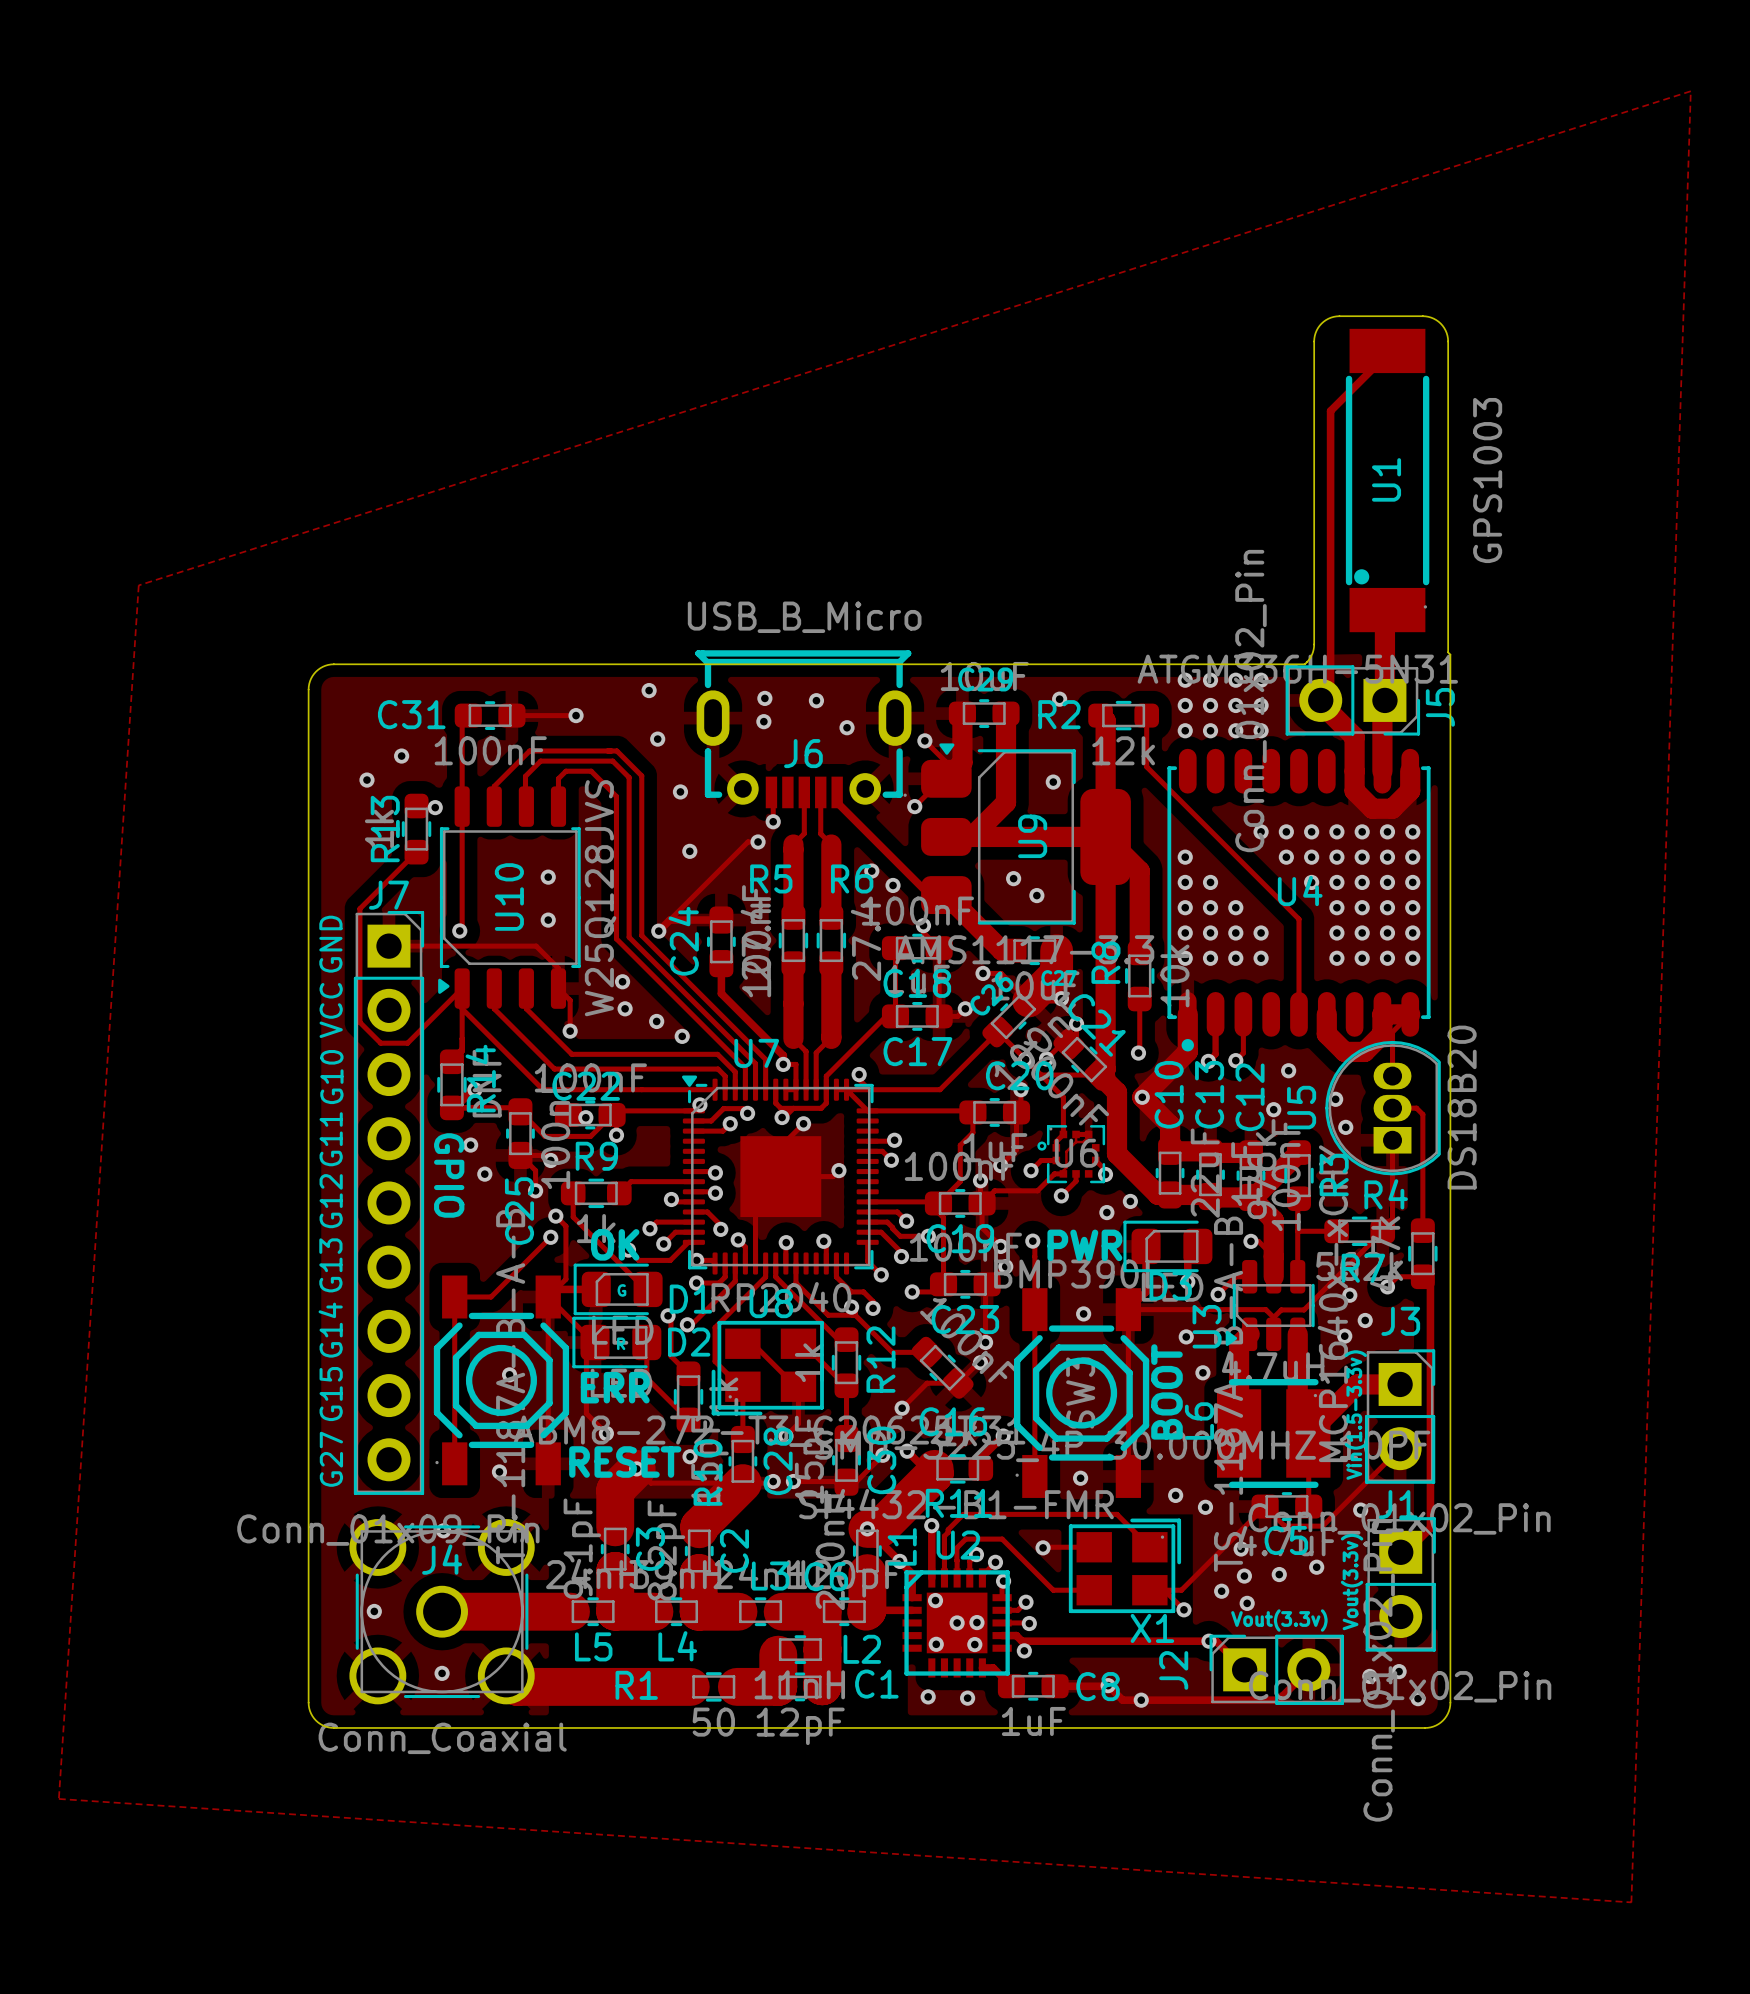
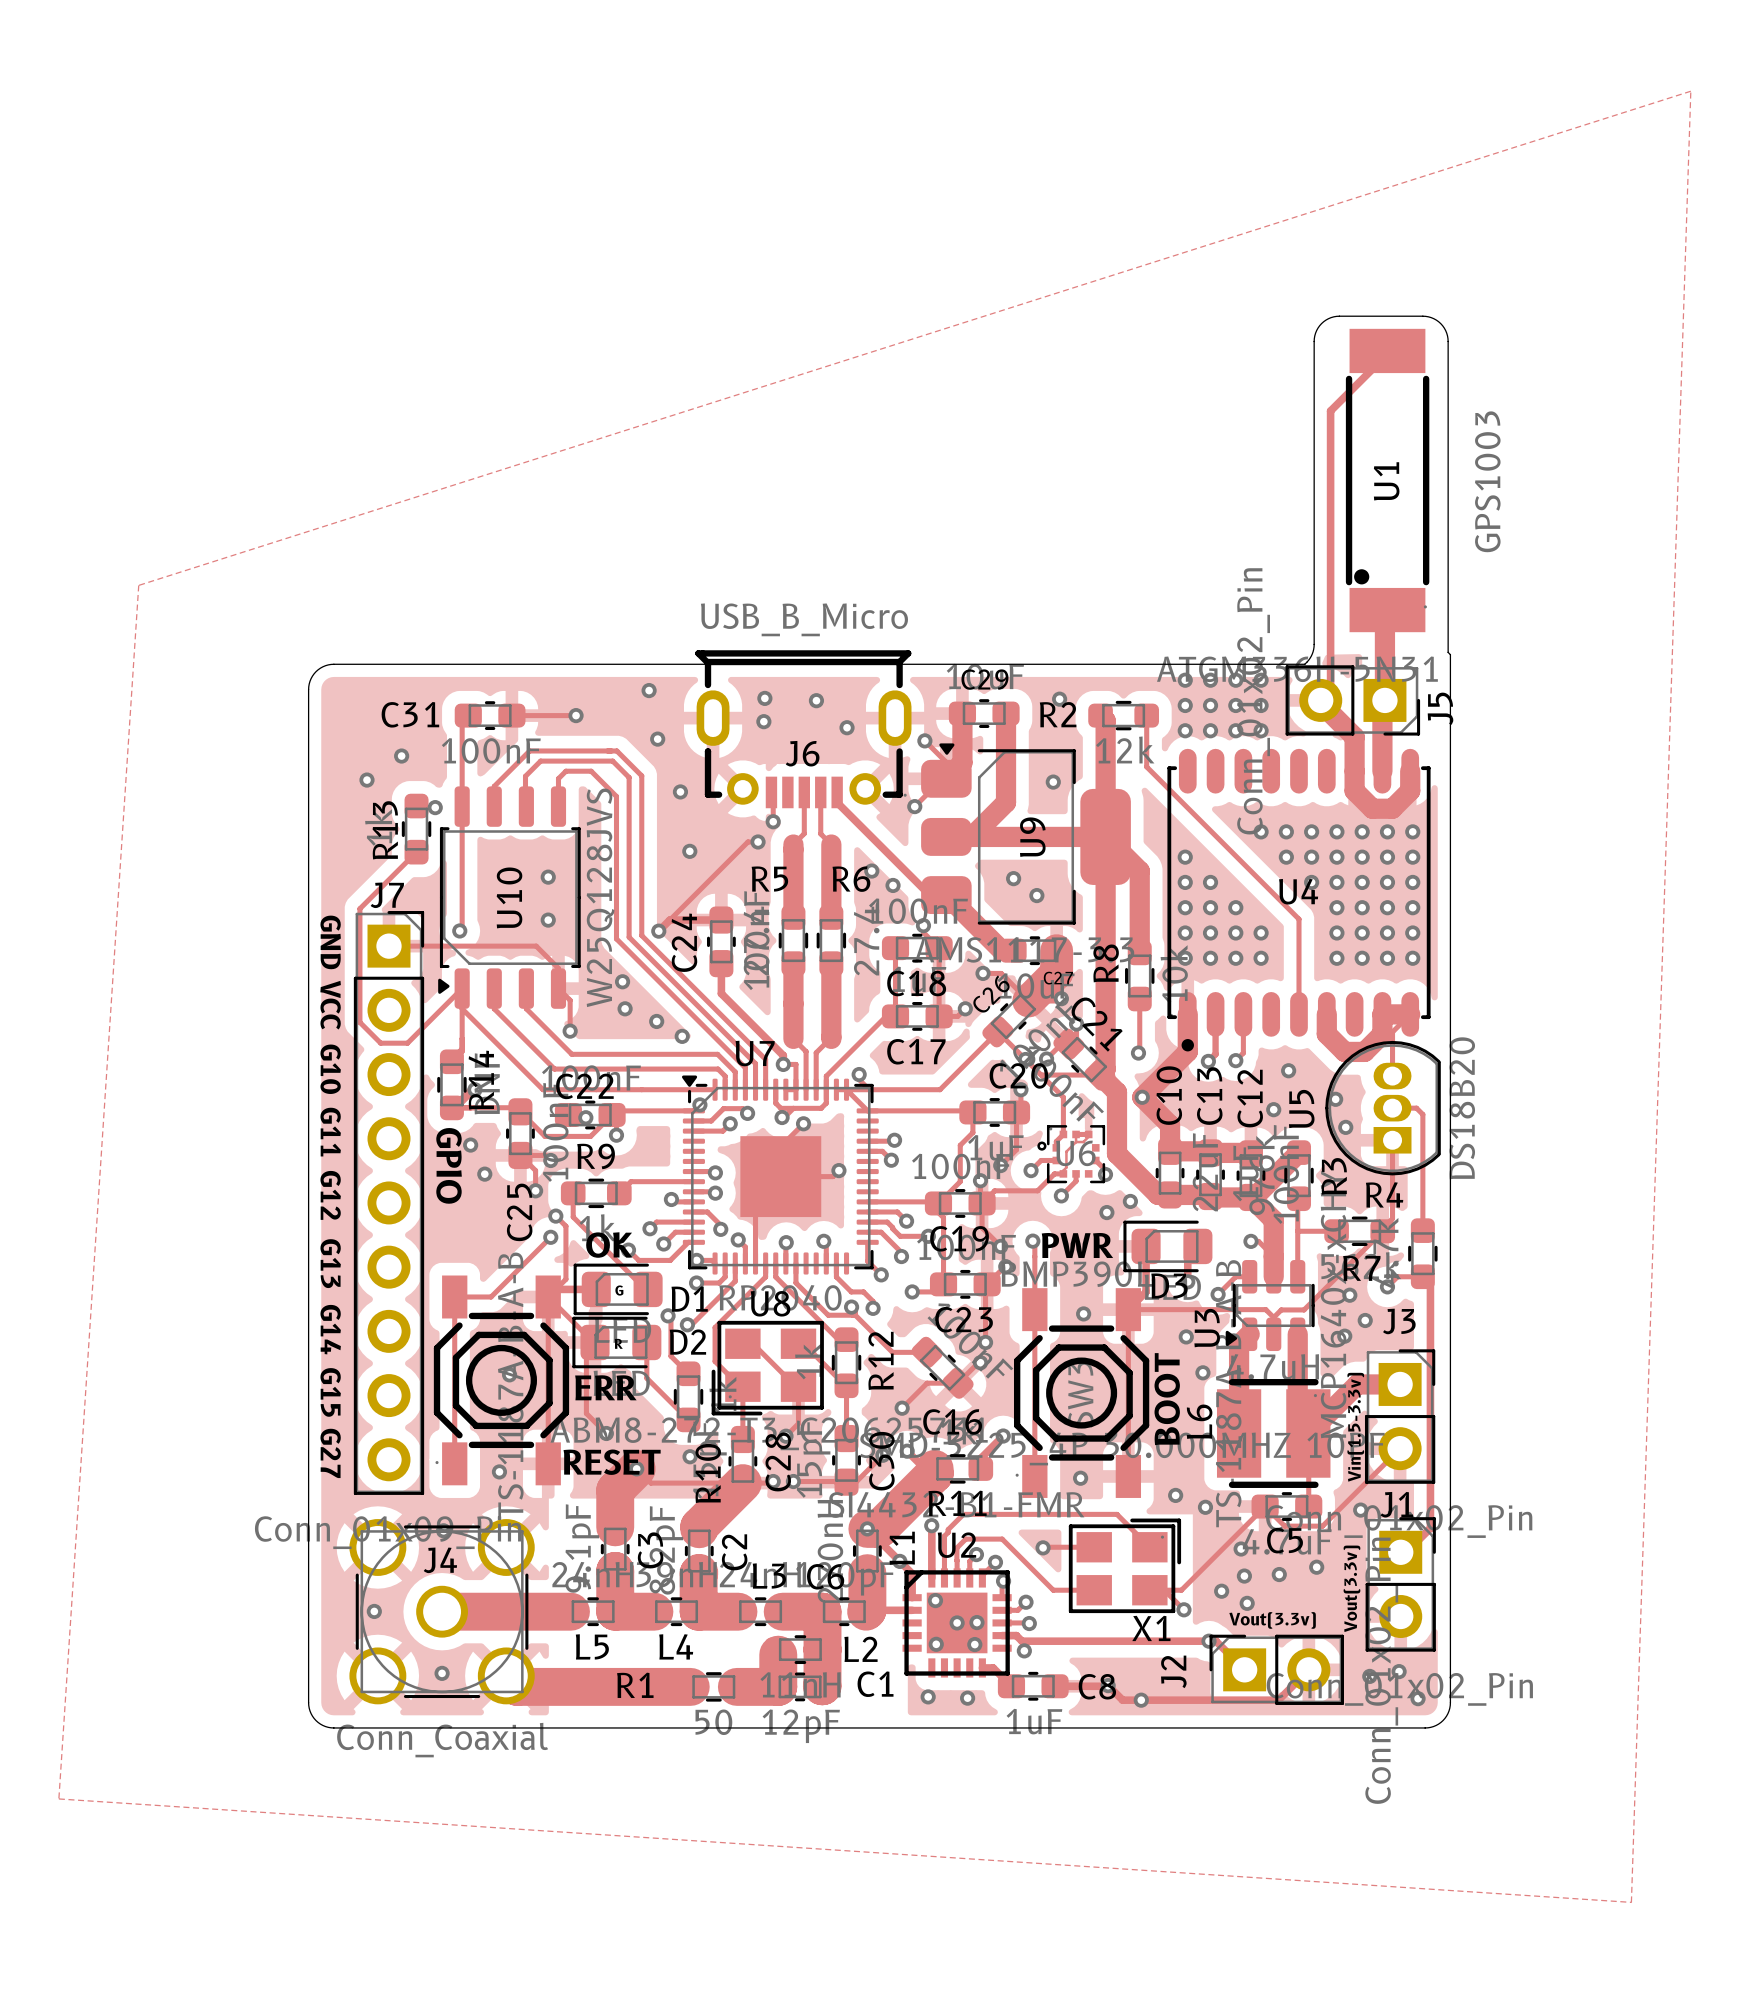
text rotation: 0° (330, 944) -> 180° (330, 942)
text rotation: 0° (331, 1010) -> 180° (330, 1005)
text rotation: 0° (331, 1077) -> 180° (330, 1069)
text rotation: 0° (331, 1139) -> 180° (330, 1132)
text rotation: 0° (331, 1201) -> 180° (330, 1195)
text rotation: 0° (330, 1265) -> 180° (330, 1263)
text rotation: 0° (330, 1330) -> 180° (330, 1329)
text rotation: 0° (331, 1394) -> 180° (330, 1392)
text rotation: 0° (331, 1459) -> 180° (330, 1453)

